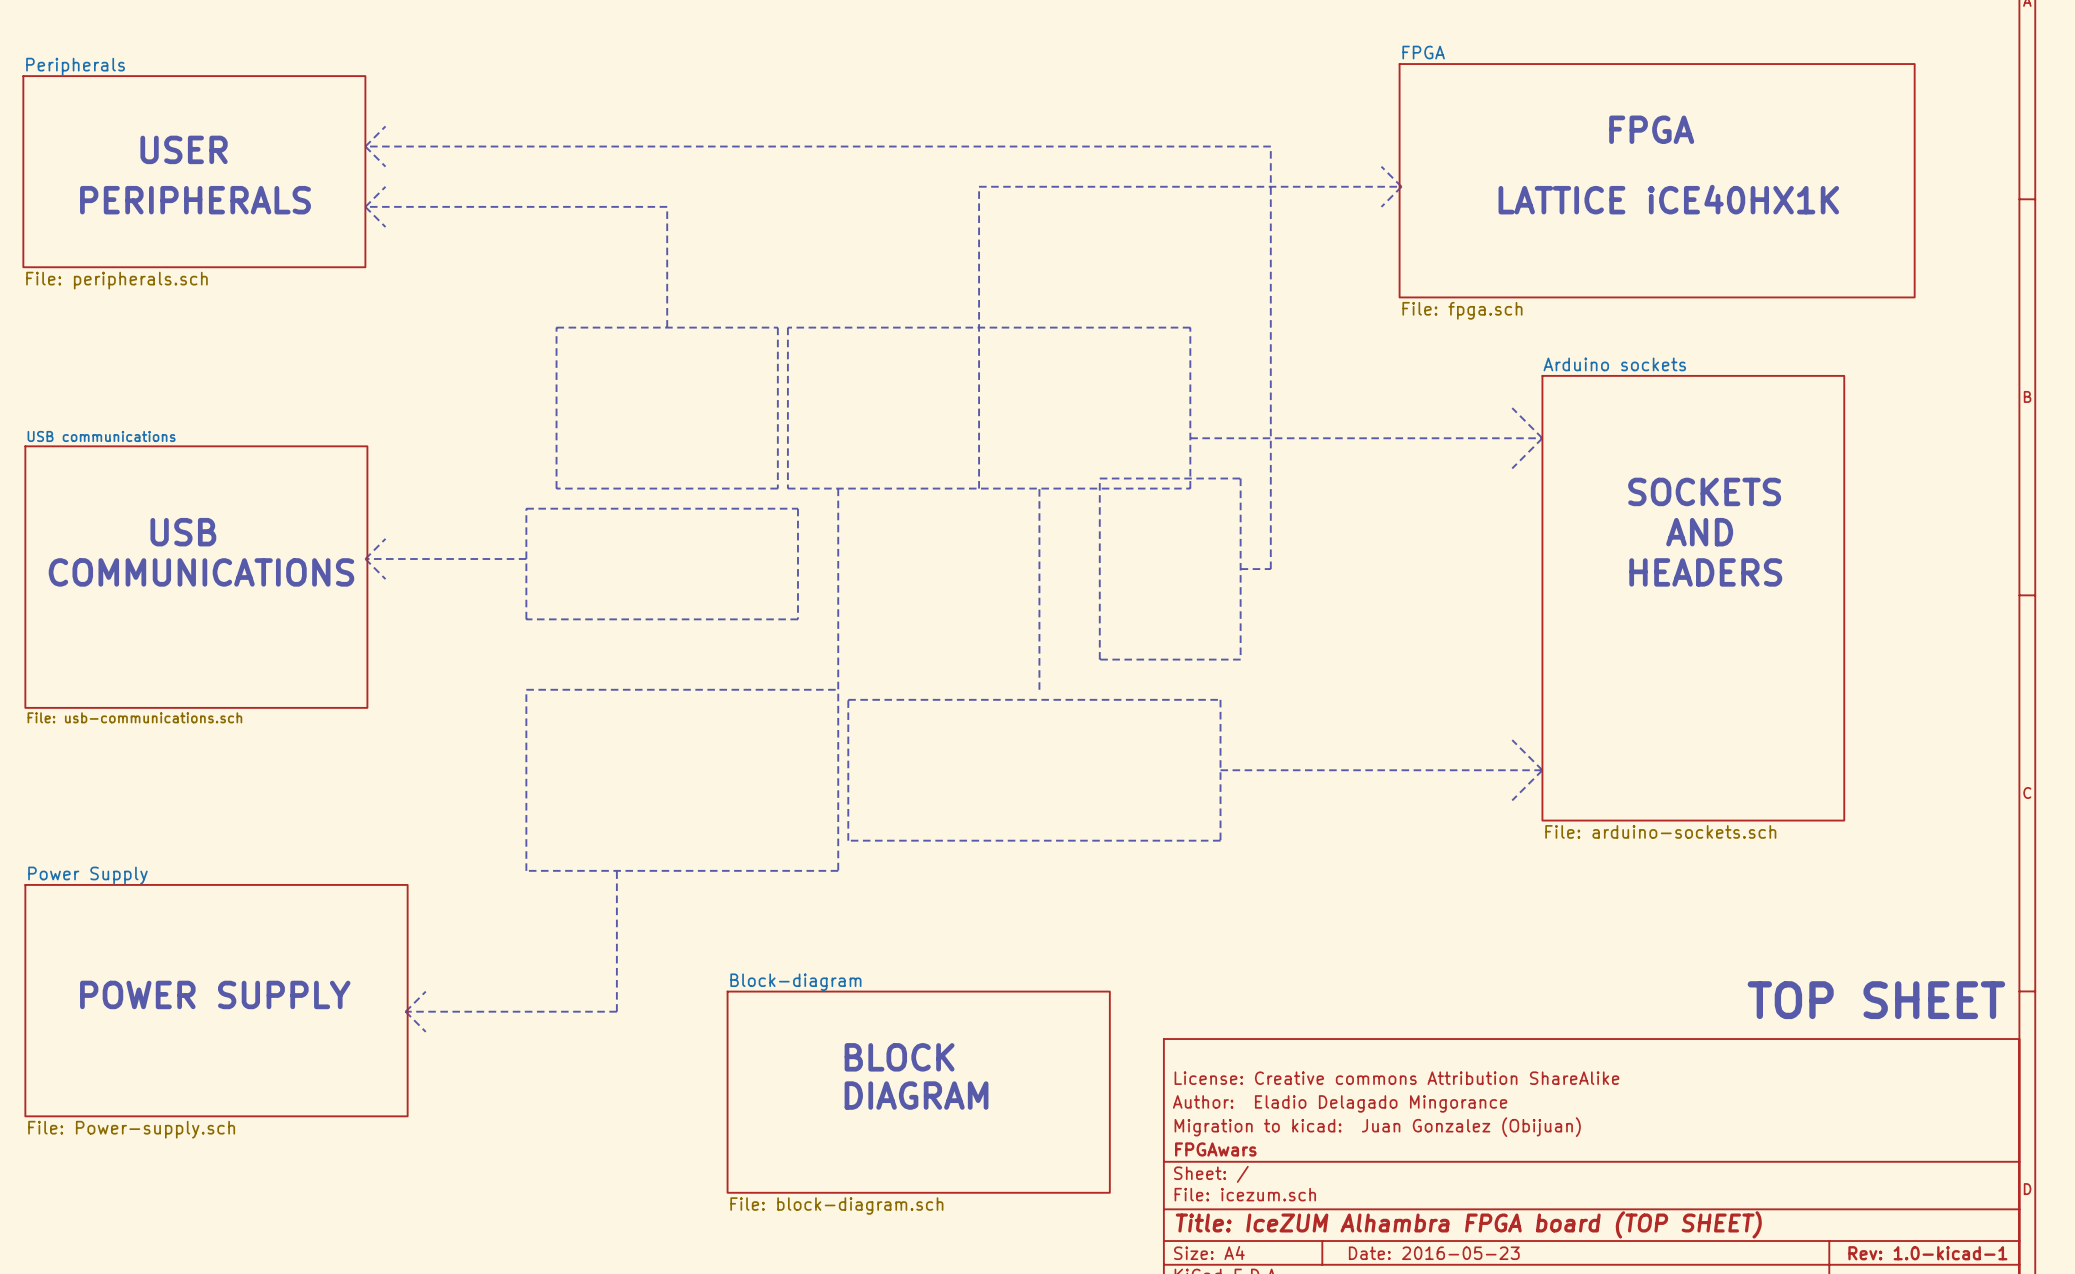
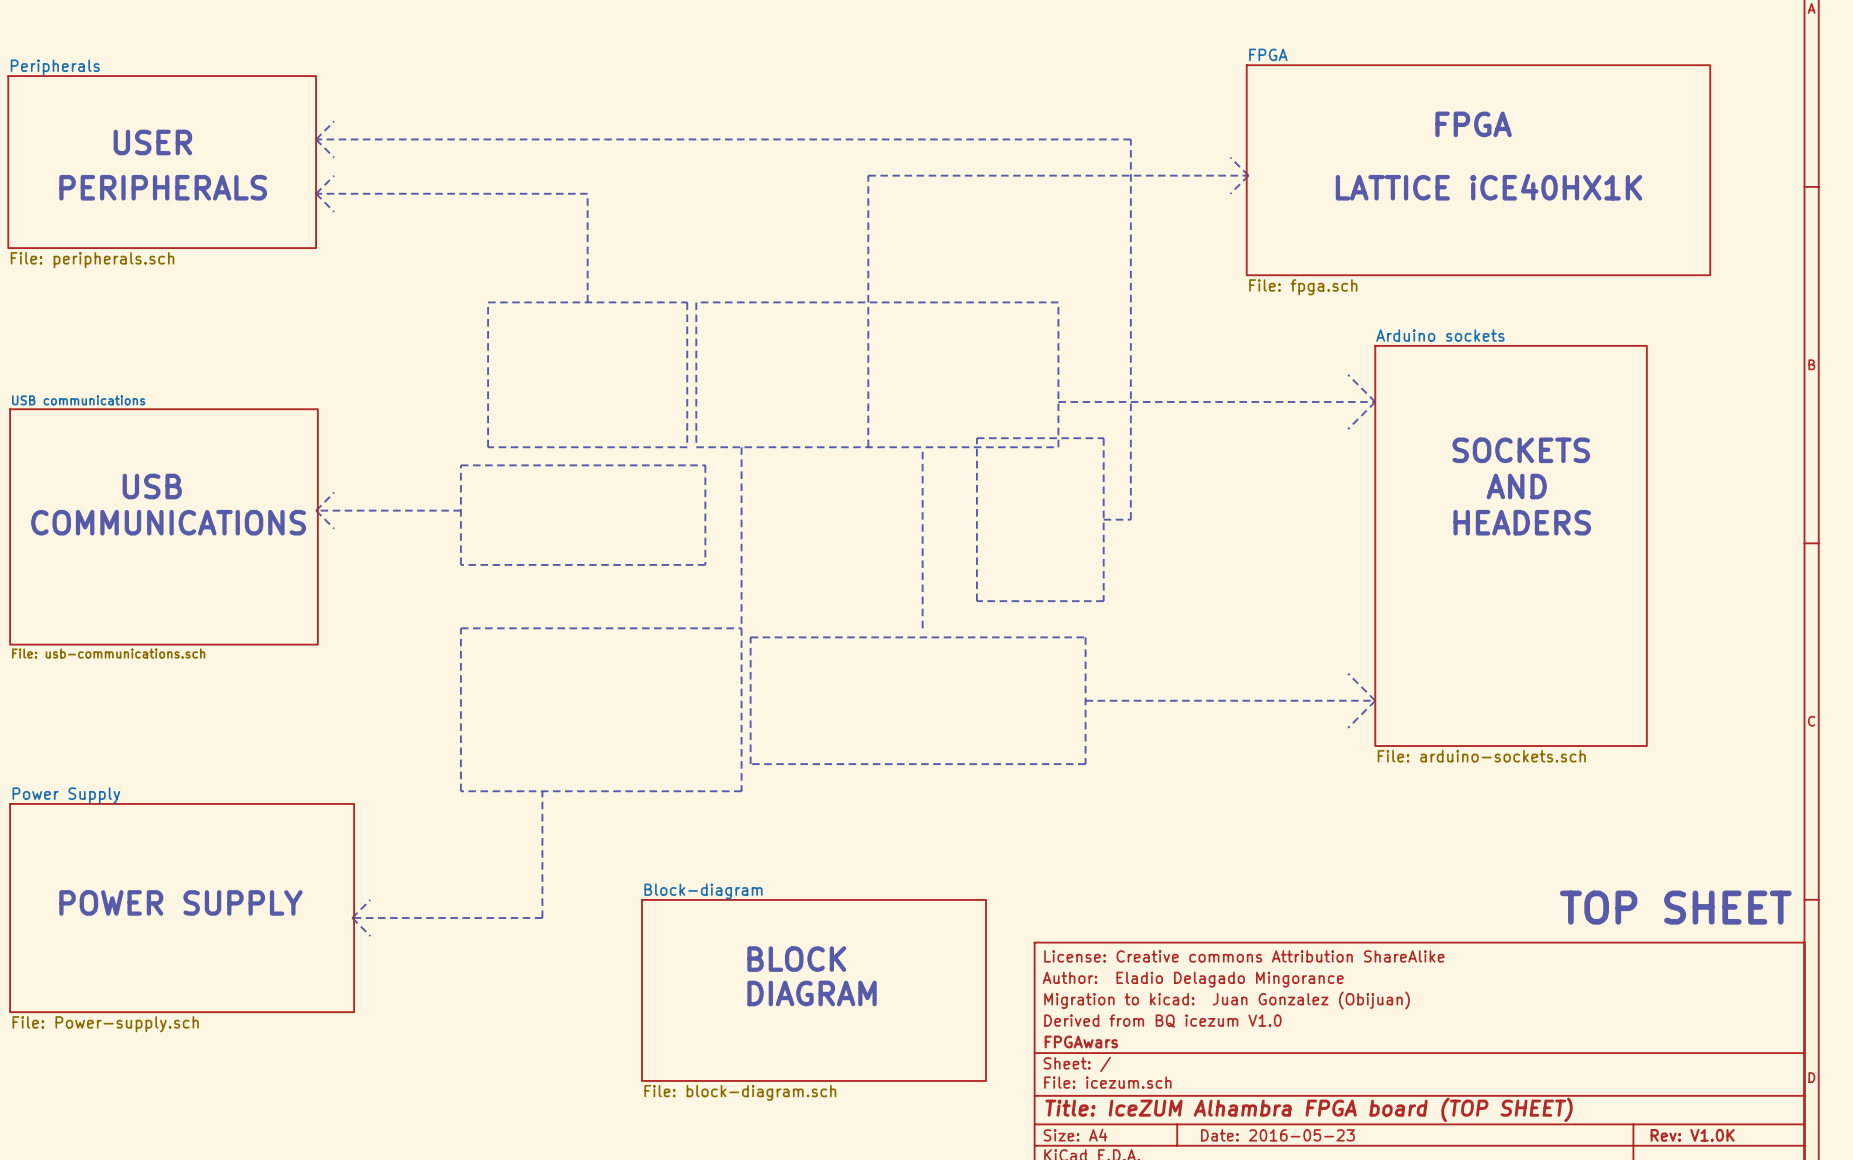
title block: none -> License: Creative commons Attribution ShareAlike (1244, 956)
title block: License: Creative commons Attribution ShareAlike (1396, 1078) -> Author: Eladio Delagado Mingorance (1193, 979)
title block: Author: Eladio Delagado Mingorance (1340, 1103) -> Migration to kicad: Juan Gonzalez (Obijuan) (1227, 1000)
title block: Migration to kicad: Juan Gonzalez (Obijuan) (1377, 1127) -> Derived from BQ icezum V1.0 (1162, 1021)
title block: Rev: 1.0-kicad-1 (1927, 1253) -> Rev: V1.0K (1692, 1135)

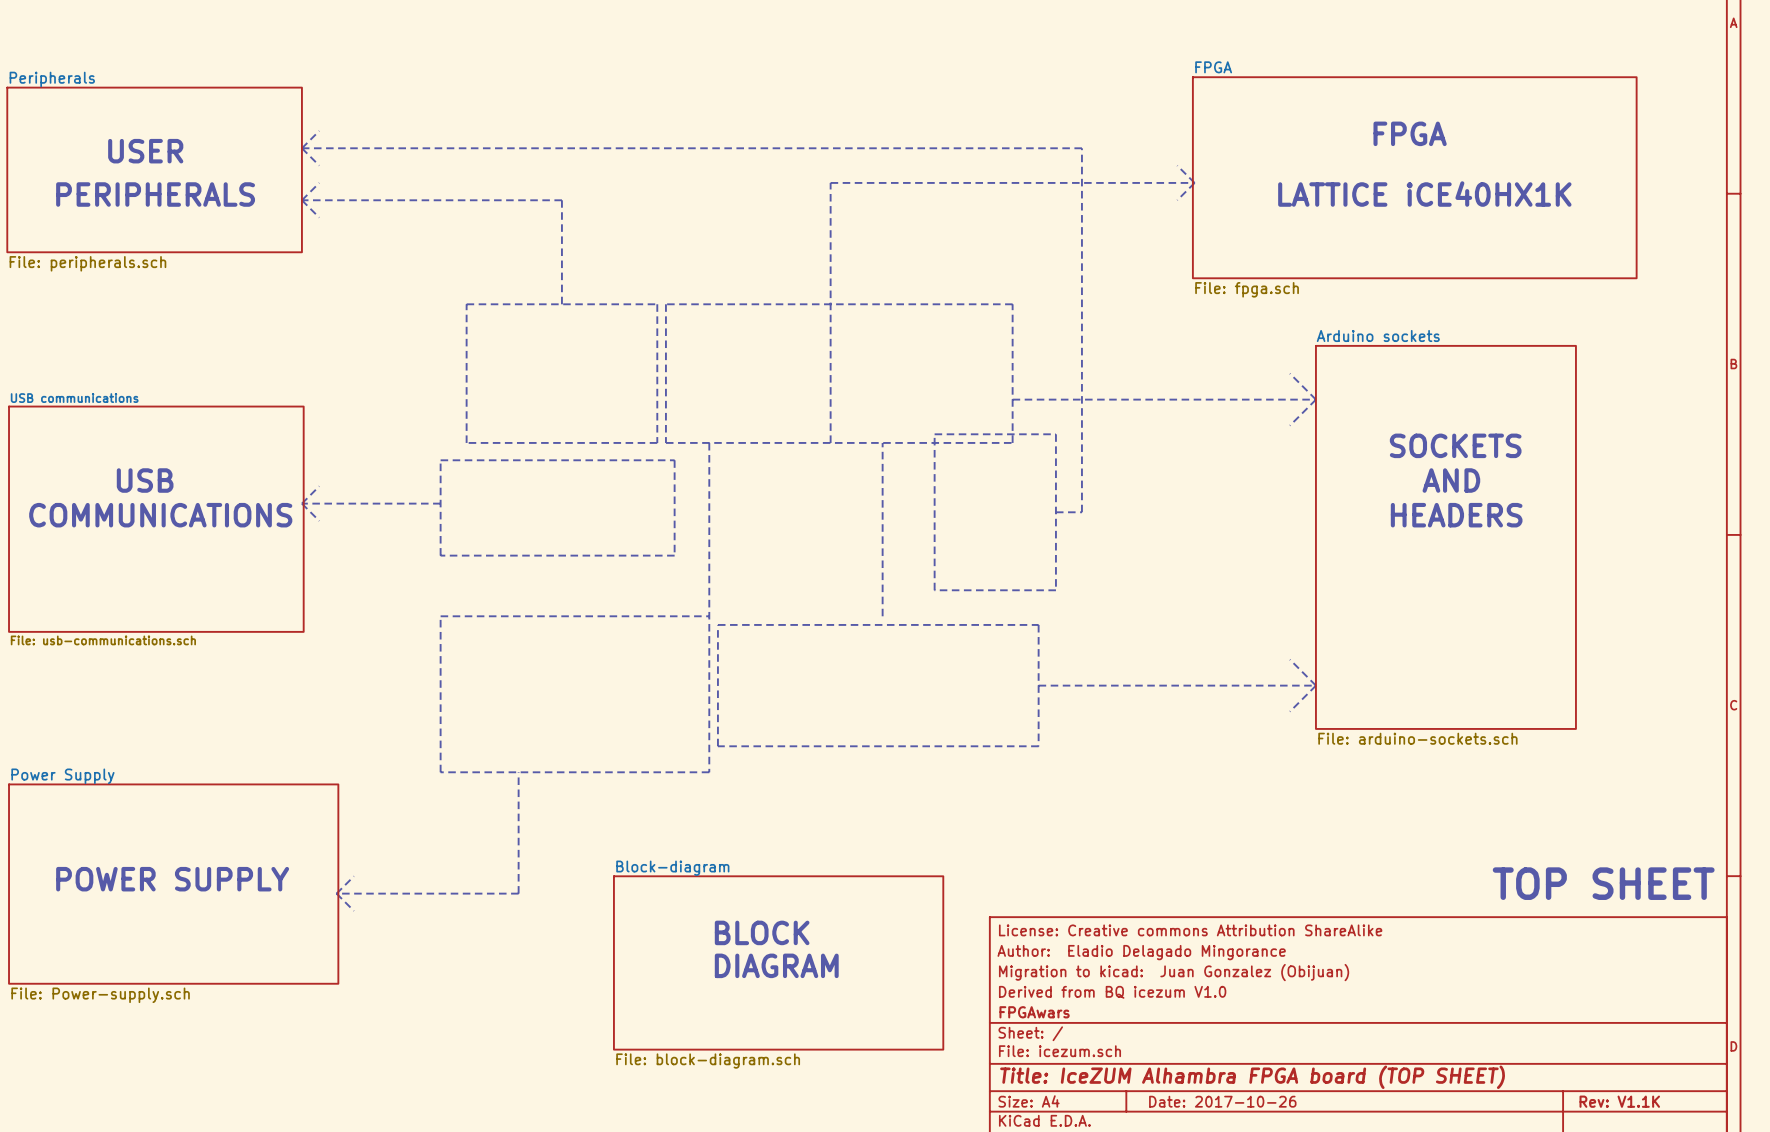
title block: Date: 2016-05-23 (1277, 1135) -> Date: 2017-10-26 (1222, 1101)
title block: Rev: V1.0K (1692, 1135) -> Rev: V1.1K (1619, 1101)

